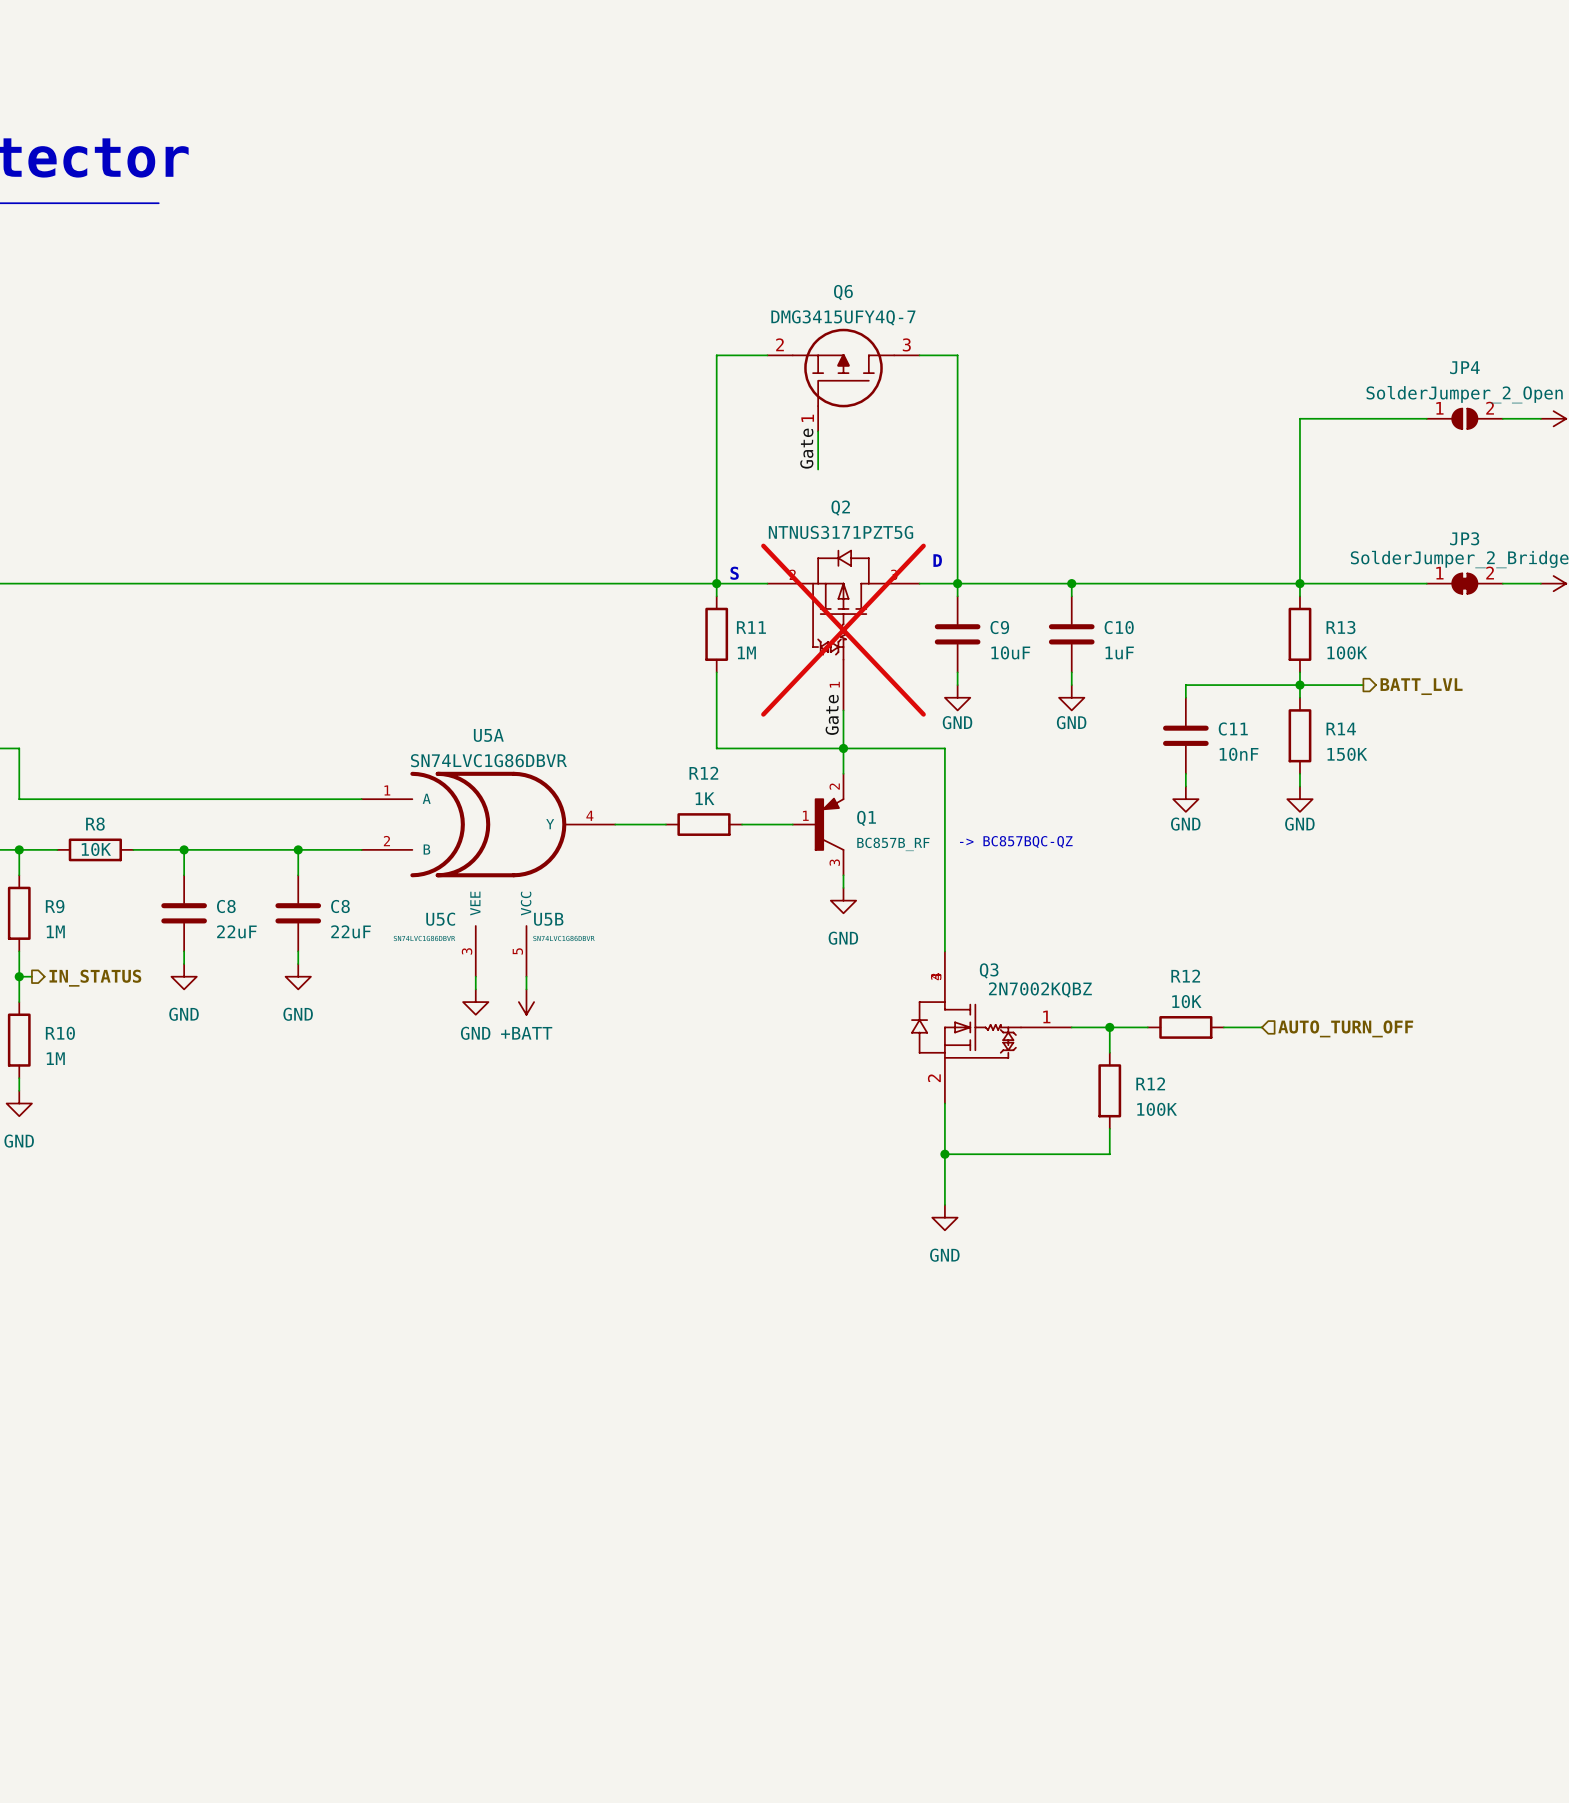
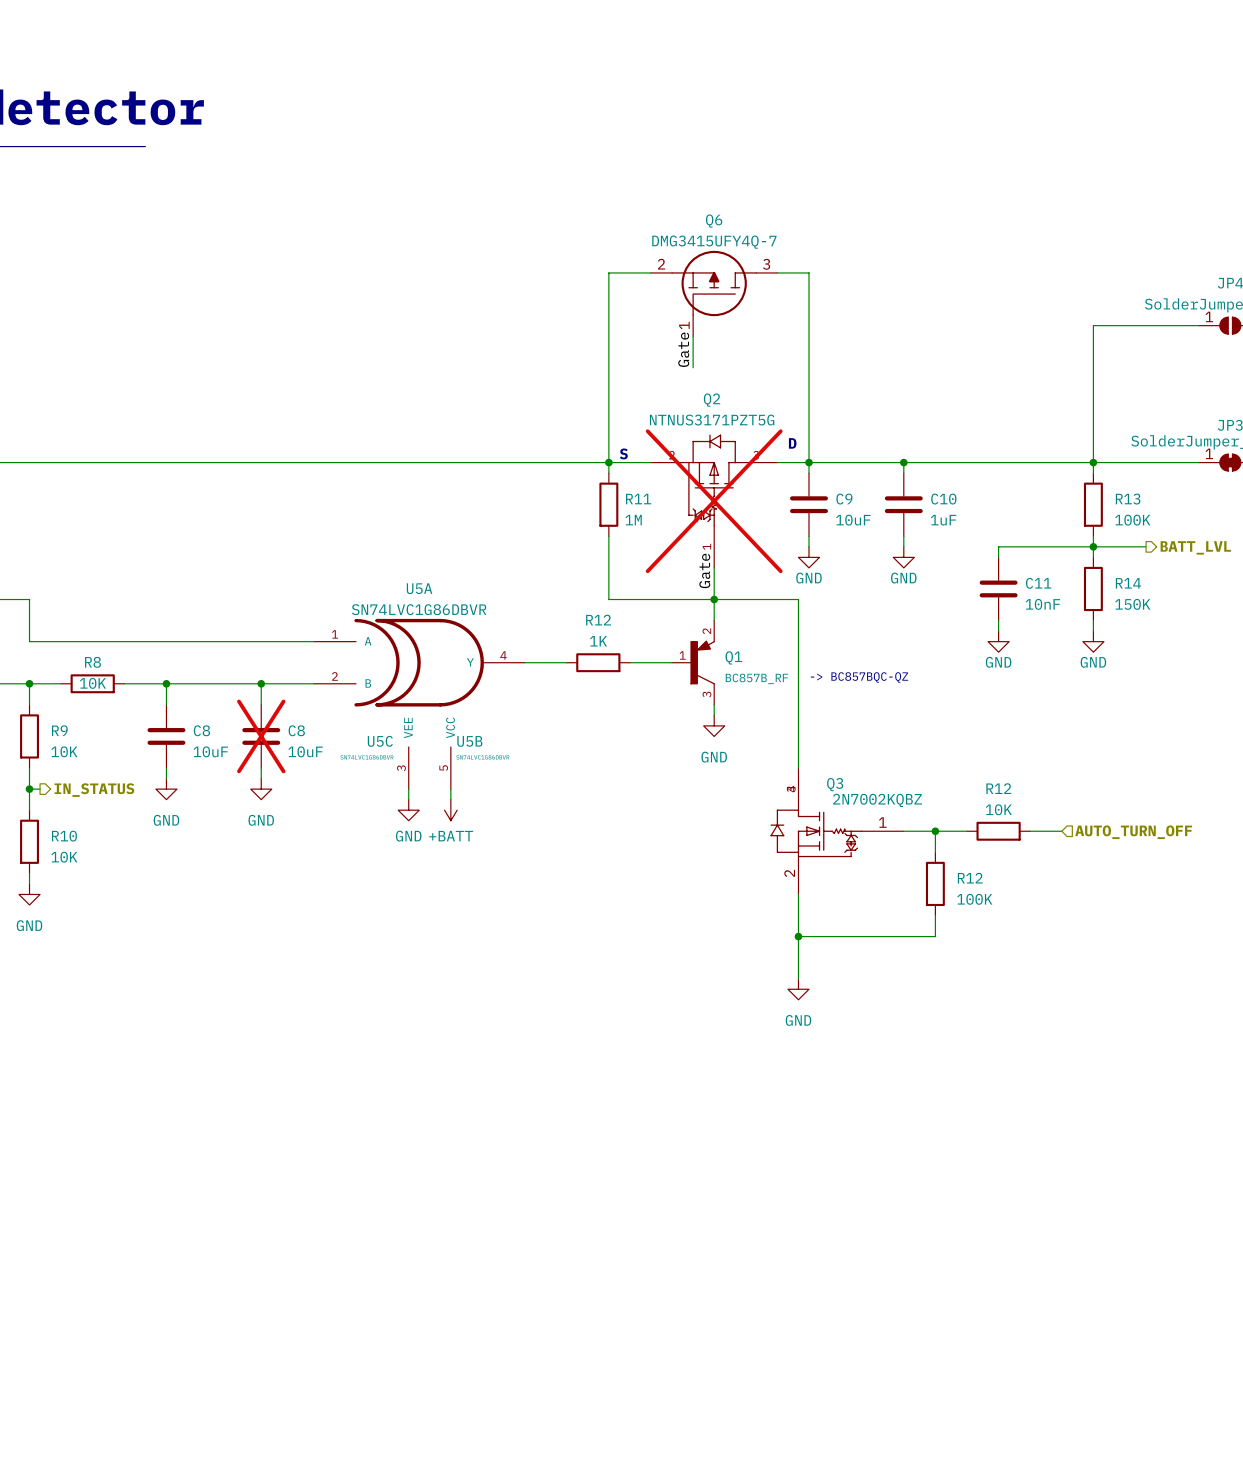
C8 do-not-place cross: none -> (261, 736)
R9 value: 1M (55, 931) -> 10K (64, 751)
C8 value: 22uF (236, 931) -> 10uF (210, 751)
C8 value: 22uF (351, 931) -> 10uF (305, 751)
R10 value: 1M (55, 1058) -> 10K (64, 857)

